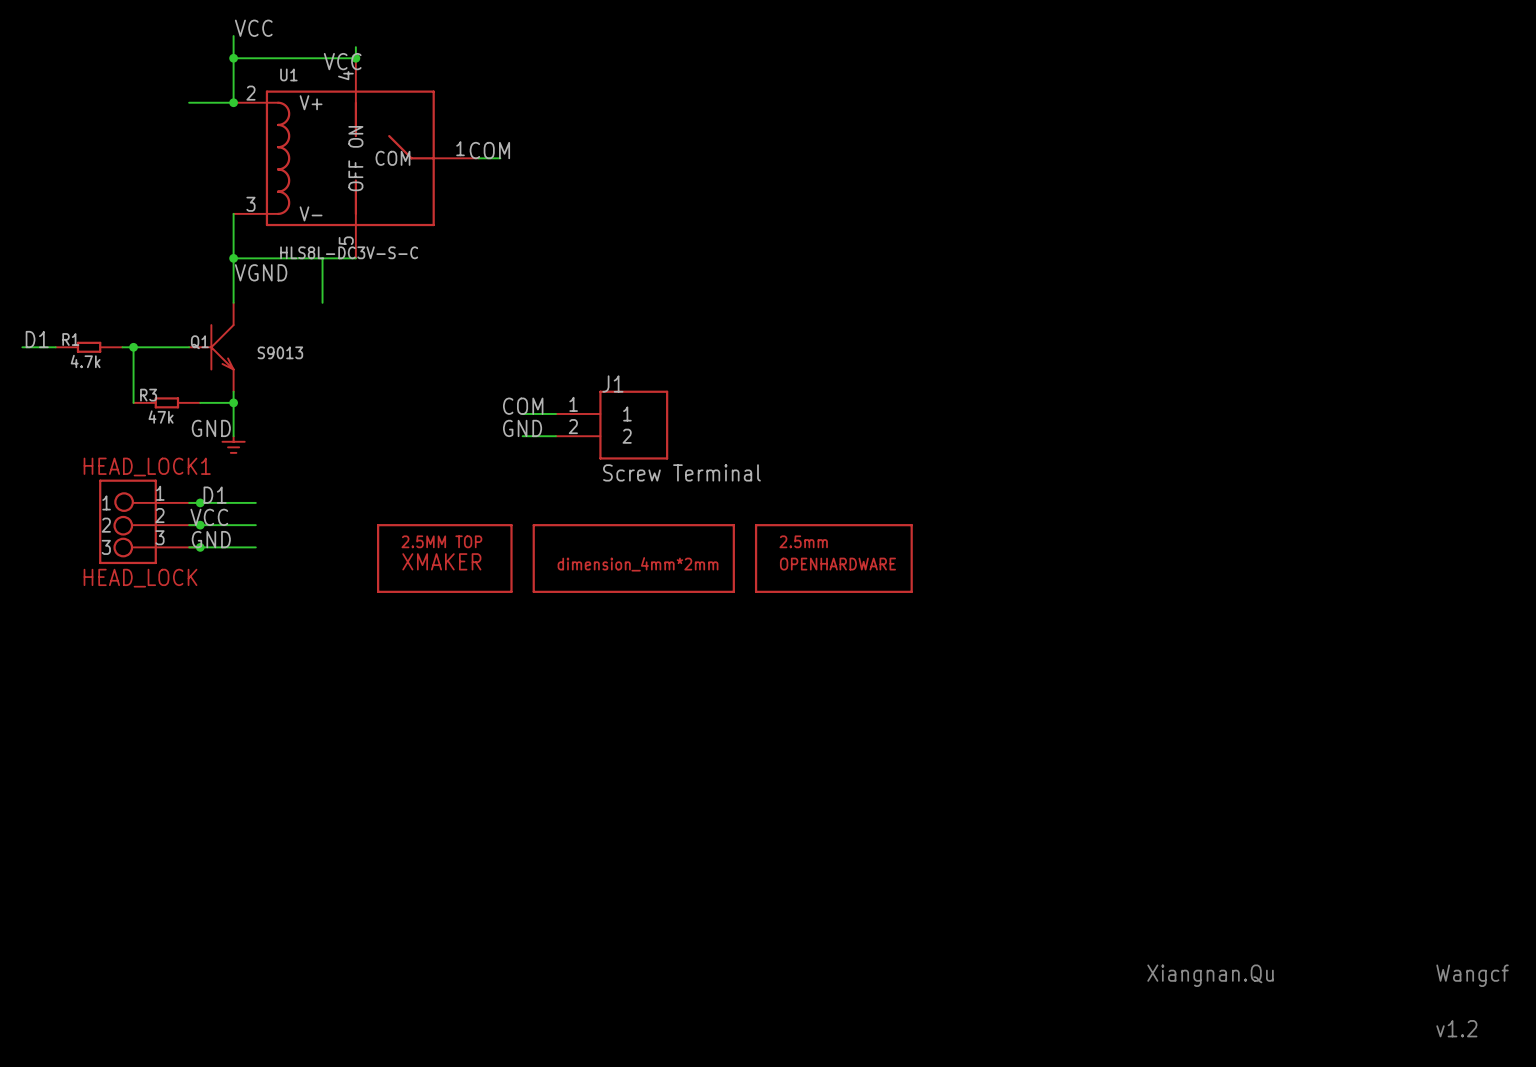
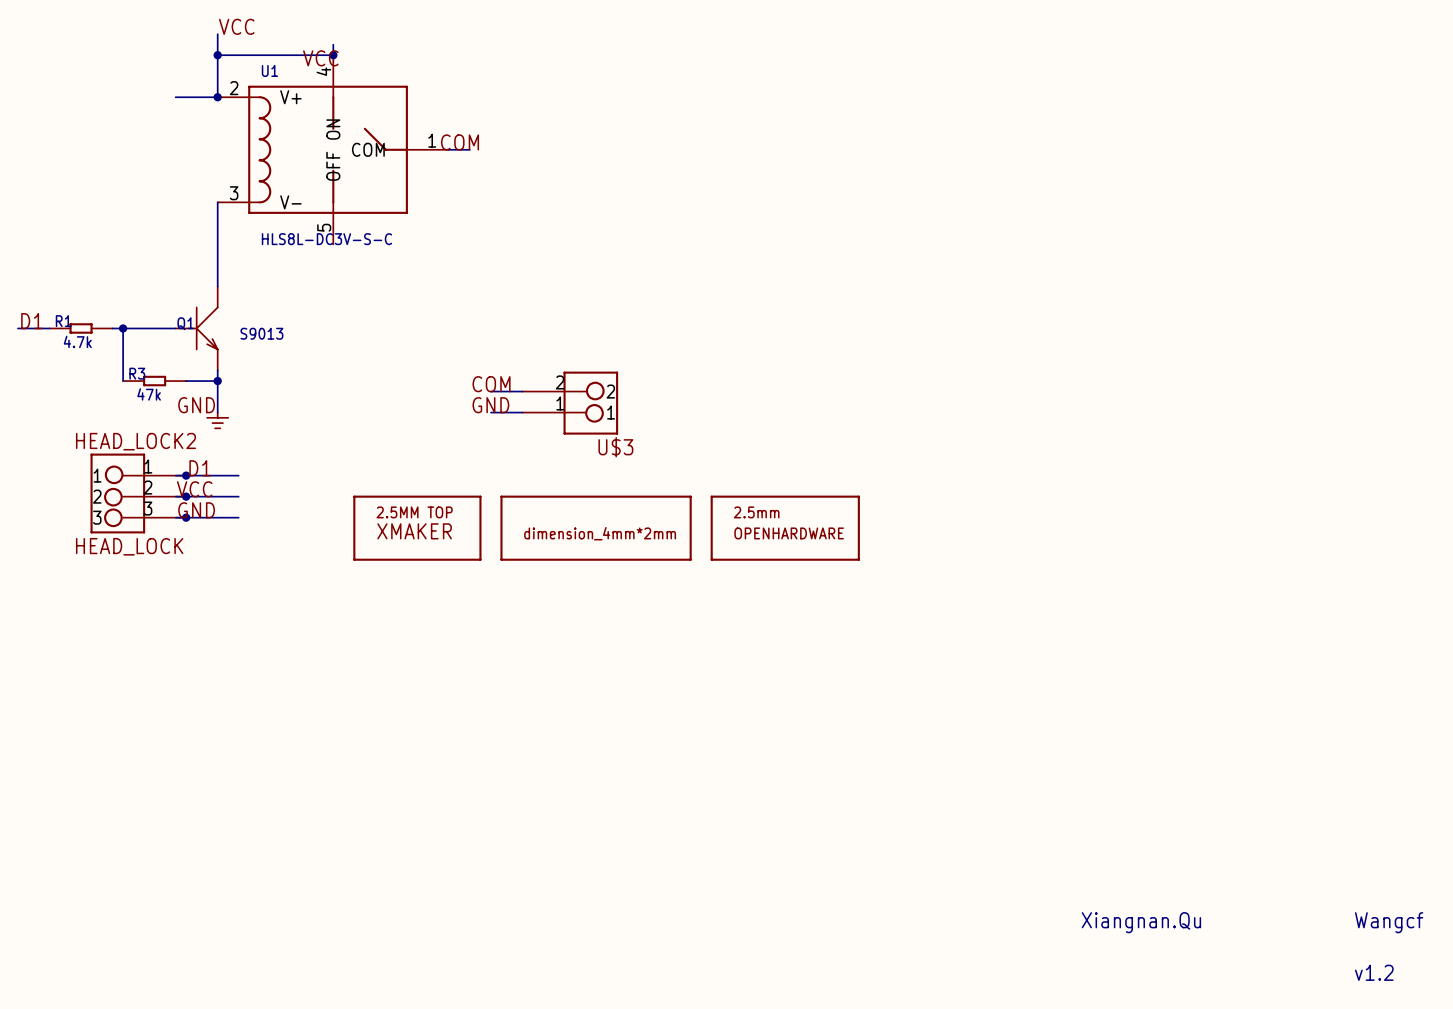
wire: (233, 258) (355, 258) -> none
junction: (233, 258) -> none
wire: (322, 258) (322, 302) -> none
label: VGND (261, 272) -> none
J1: Screw Terminal (612, 425) -> none
U$3: none -> (570, 403)
HEAD_LOCK1 name: HEAD_LOCK1 (147, 467) -> HEAD_LOCK2 (135, 441)

